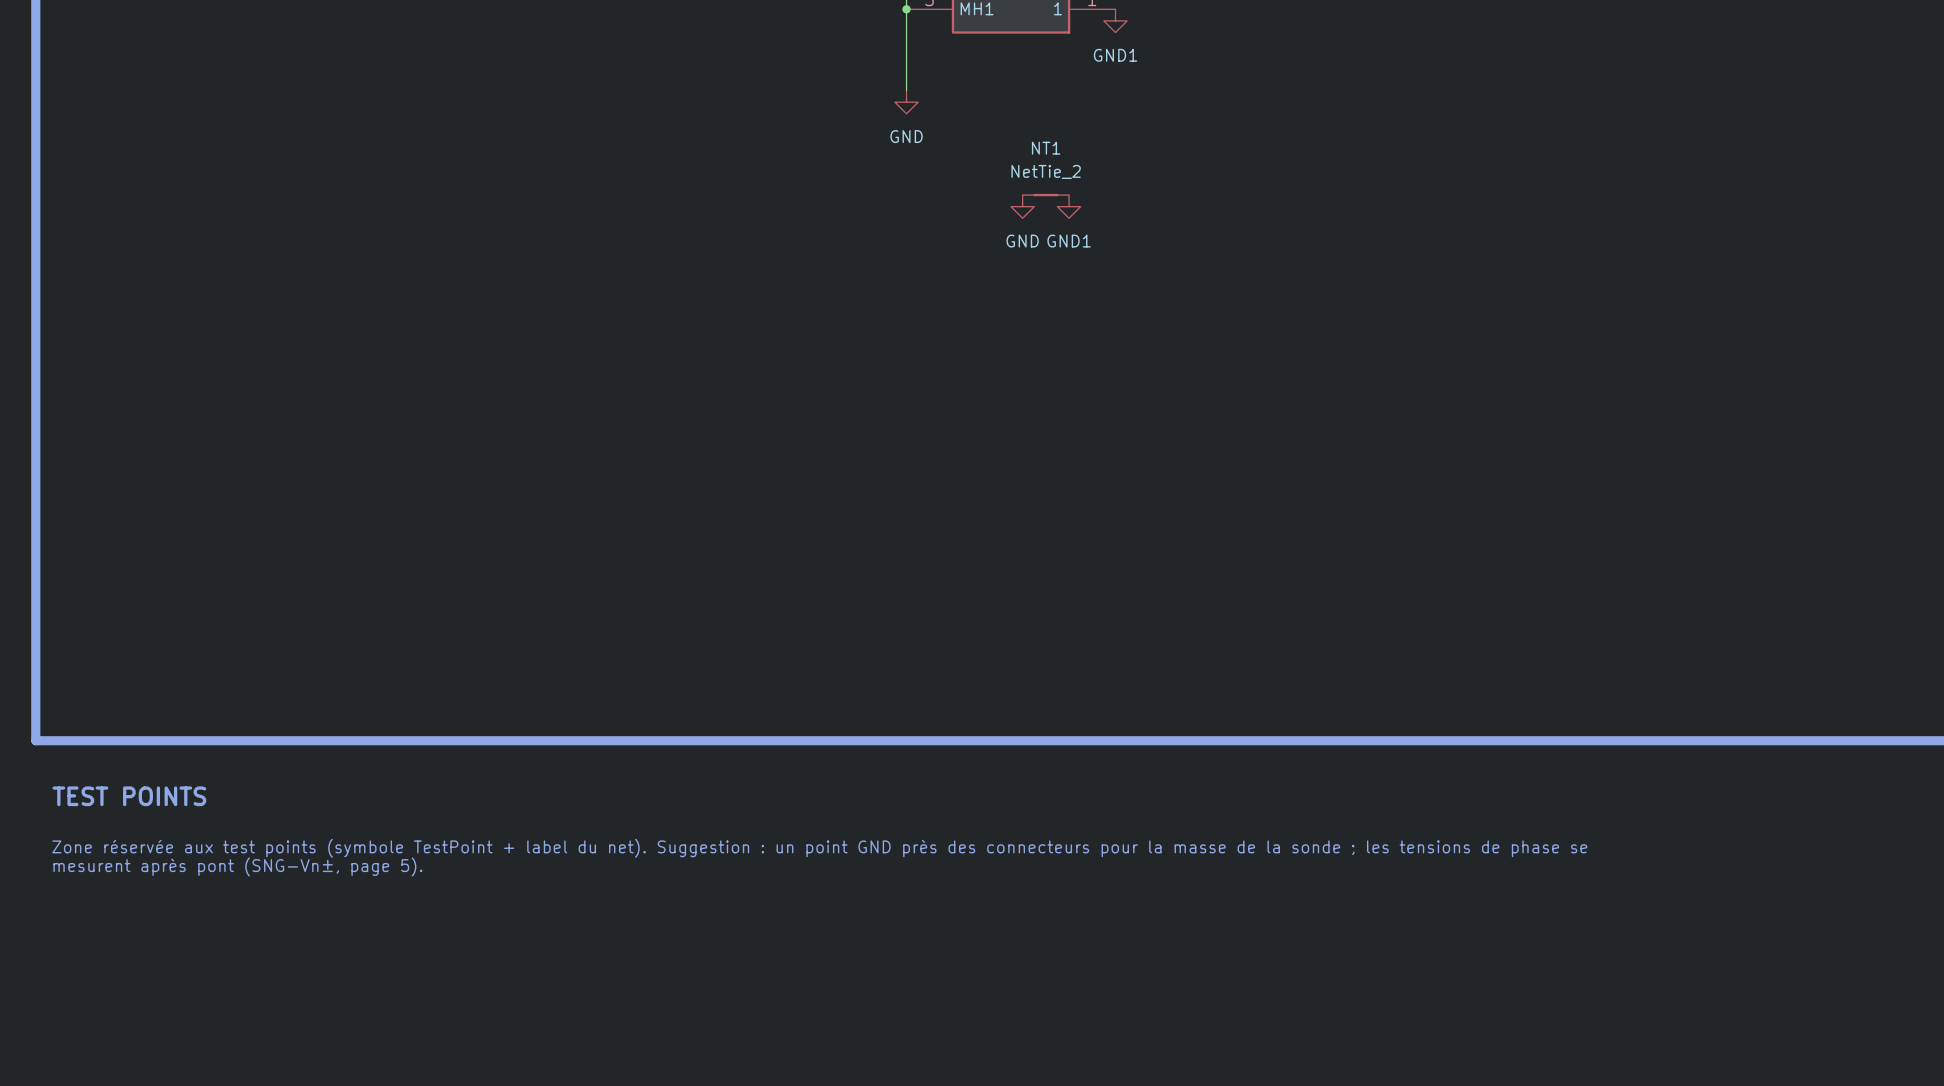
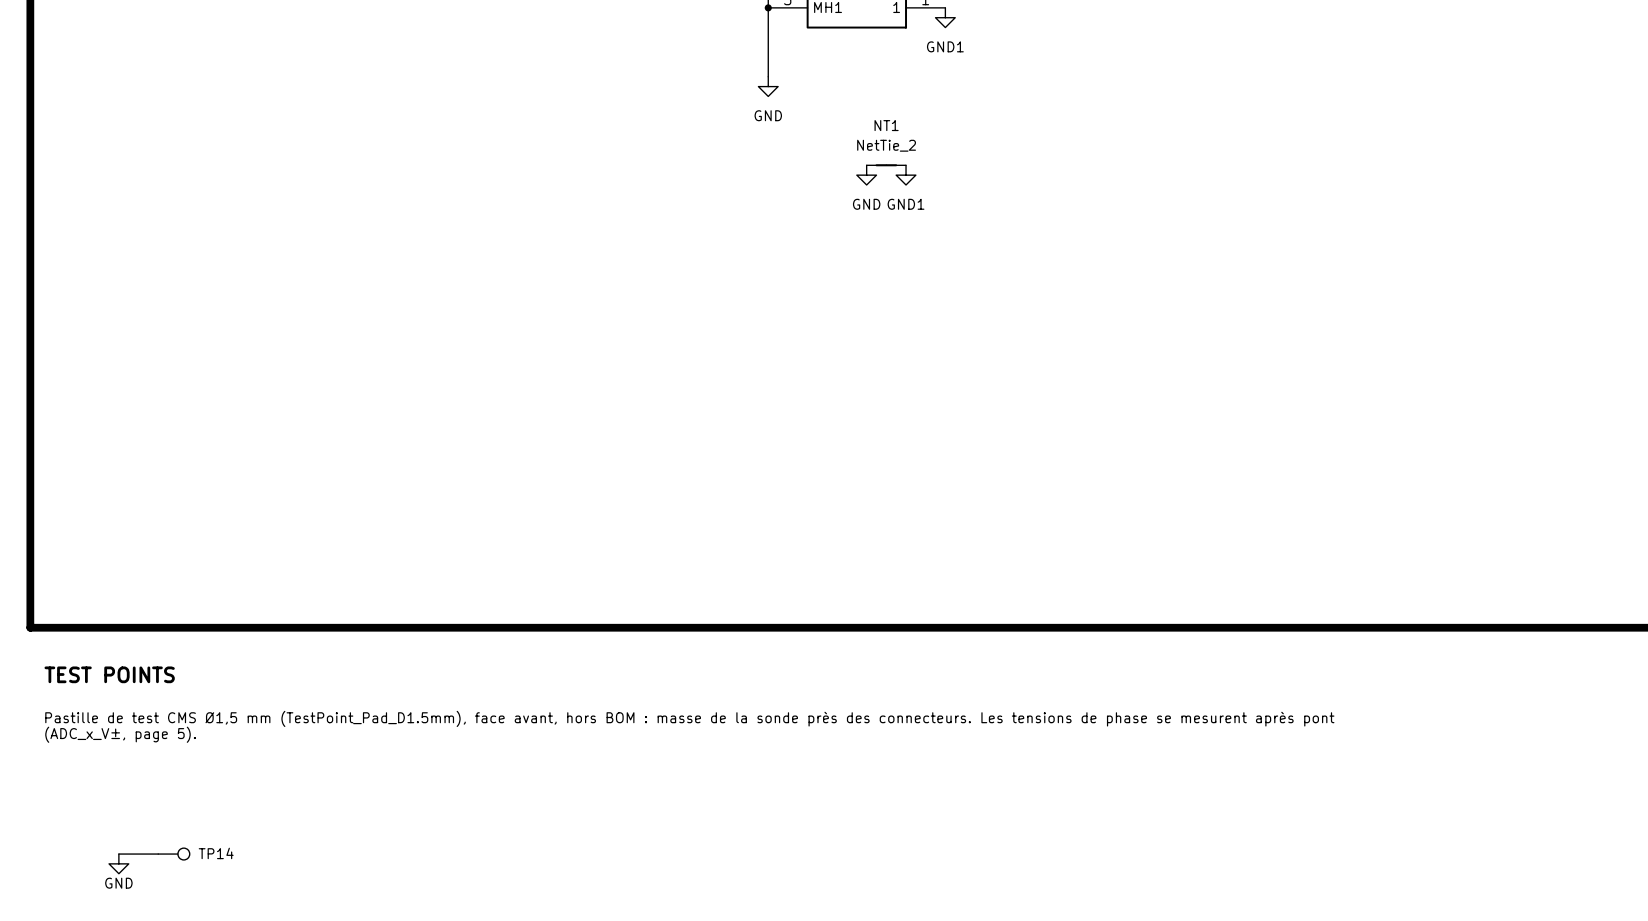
text: Zone réservée aux test points (symbole TestPoint + label du net). Suggestion : un point GND près des connecteurs pour la masse de la sonde ; les tensions de phase se (819, 848) -> Pastille de test CMS Ø1,5 mm (TestPoint_Pad_D1.5mm), face avant, hors BOM : masse de la sonde près des connecteurs. Les tensions de phase se mesurent après pont (689, 718)
text: mesurent après pont (SNG-Vn±, page 5). (237, 866) -> (ADC_x_V±, page 5). (120, 734)
wire: none -> (118, 854) (158, 854)
TP14: none -> (173, 854)
power symbol: none -> GND (118, 863)

